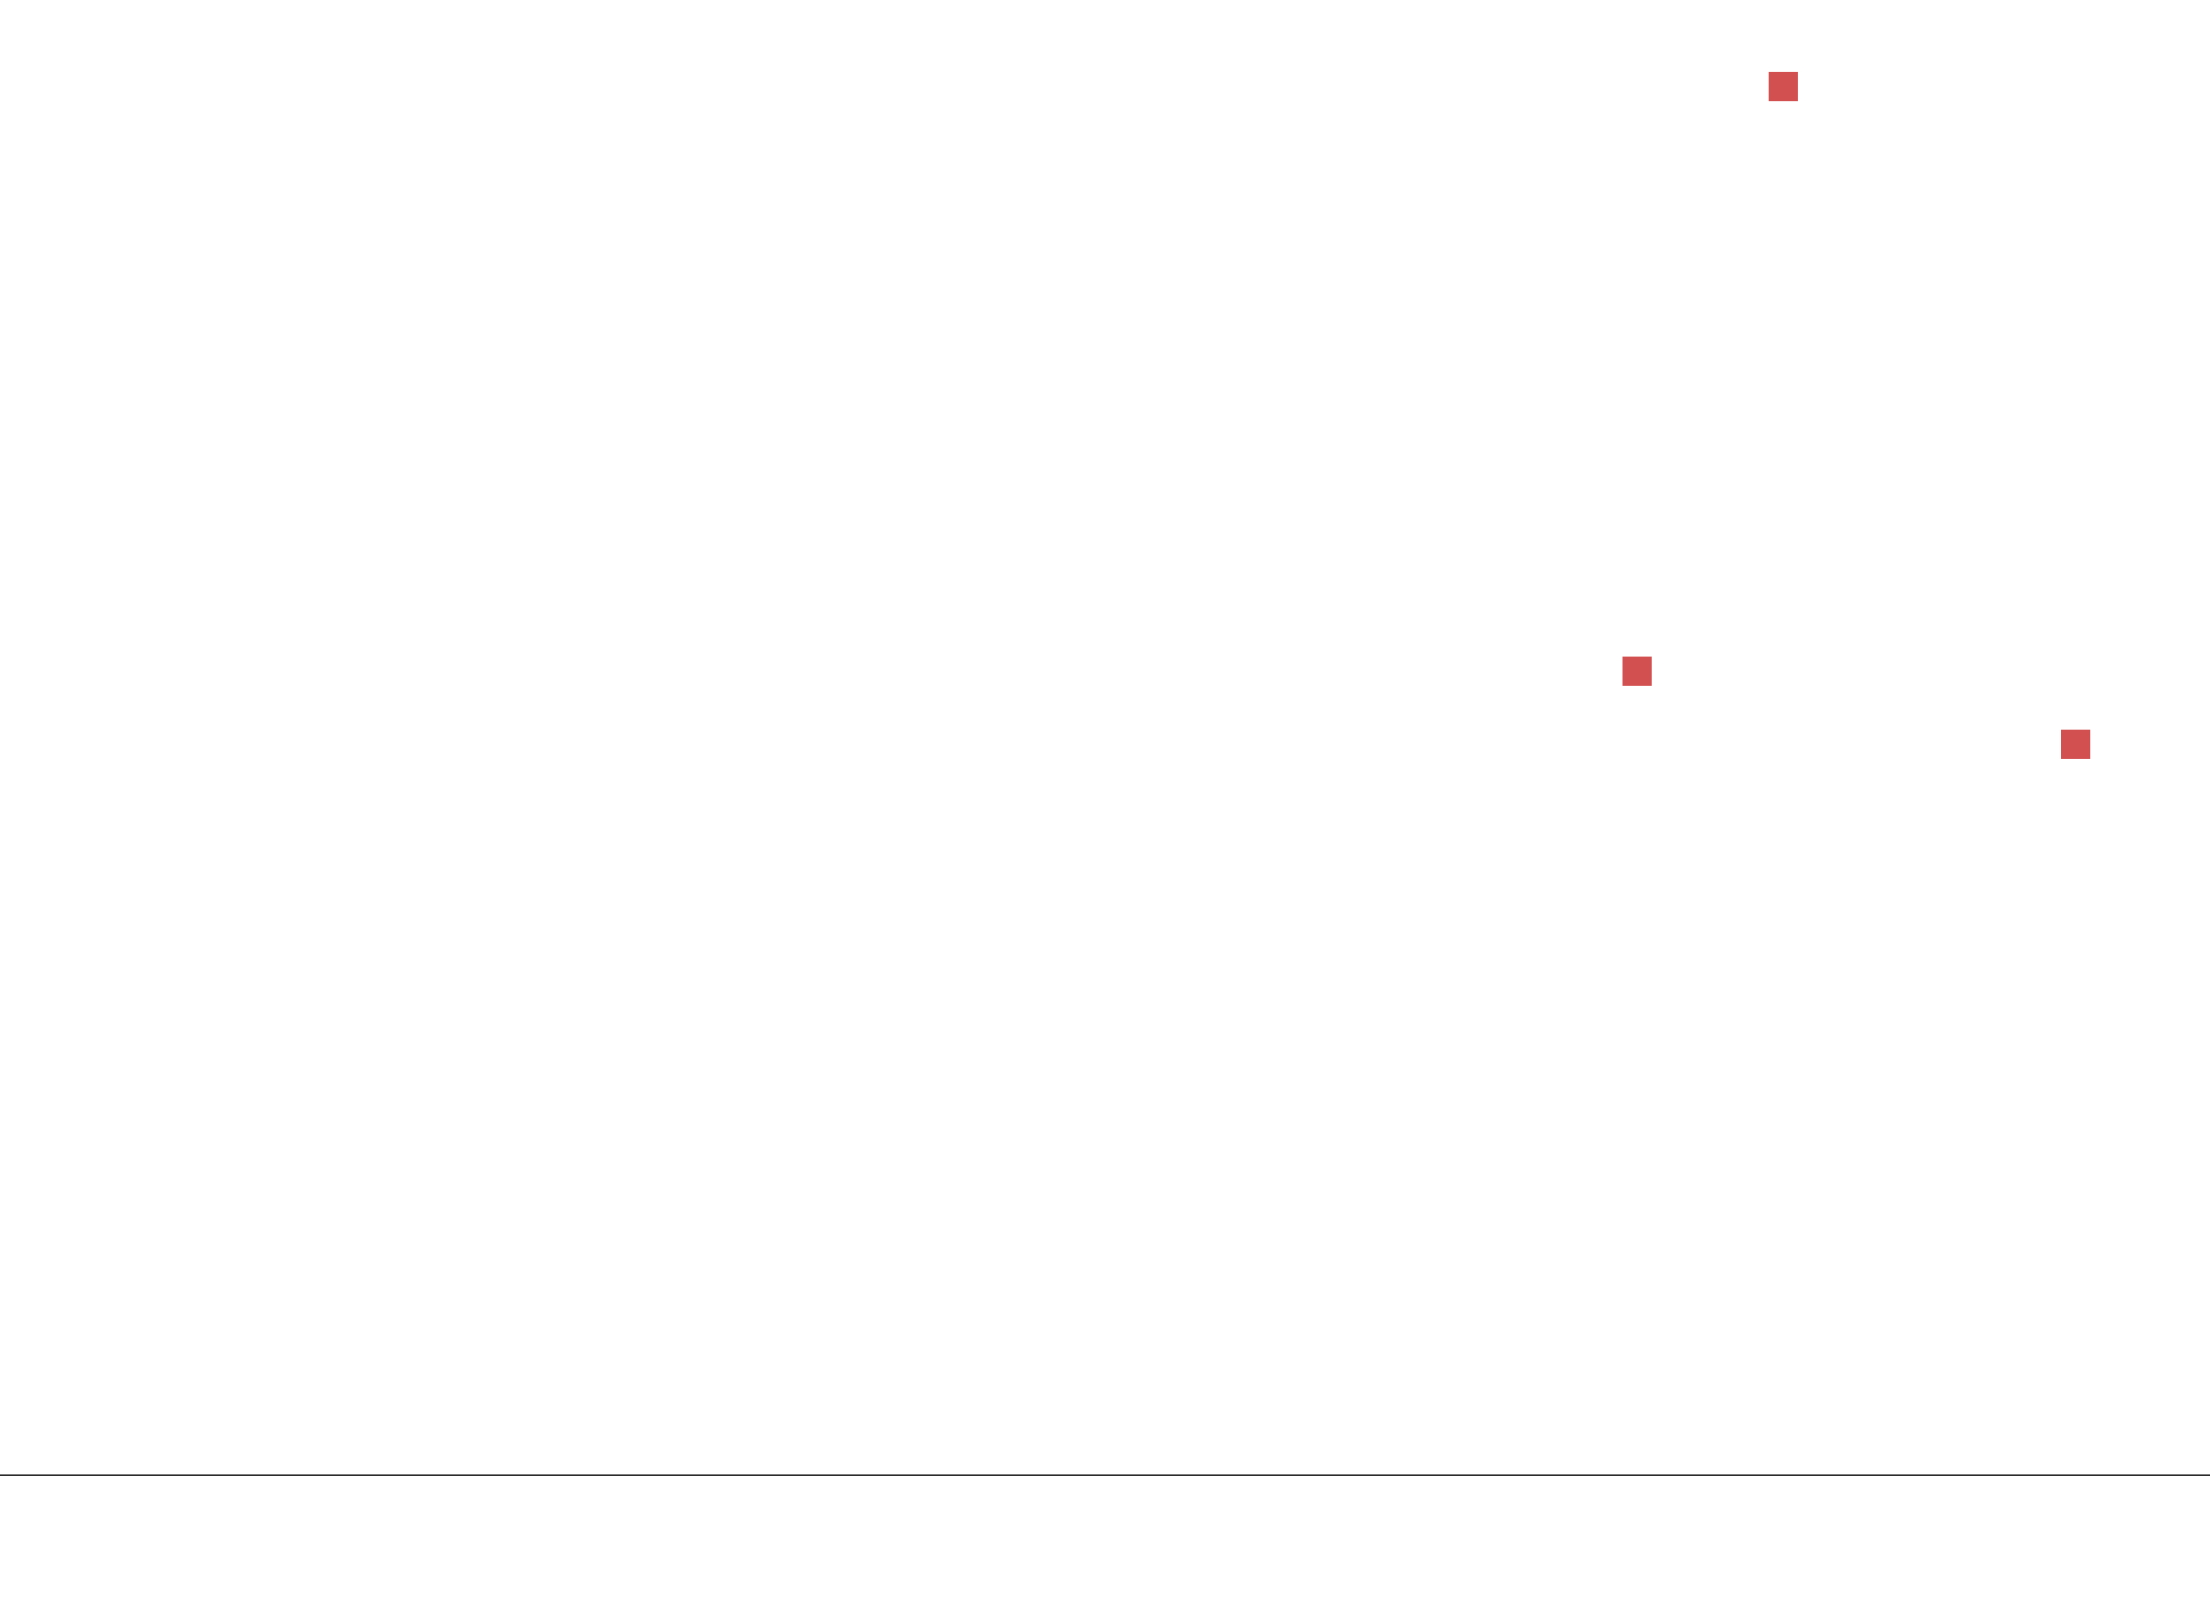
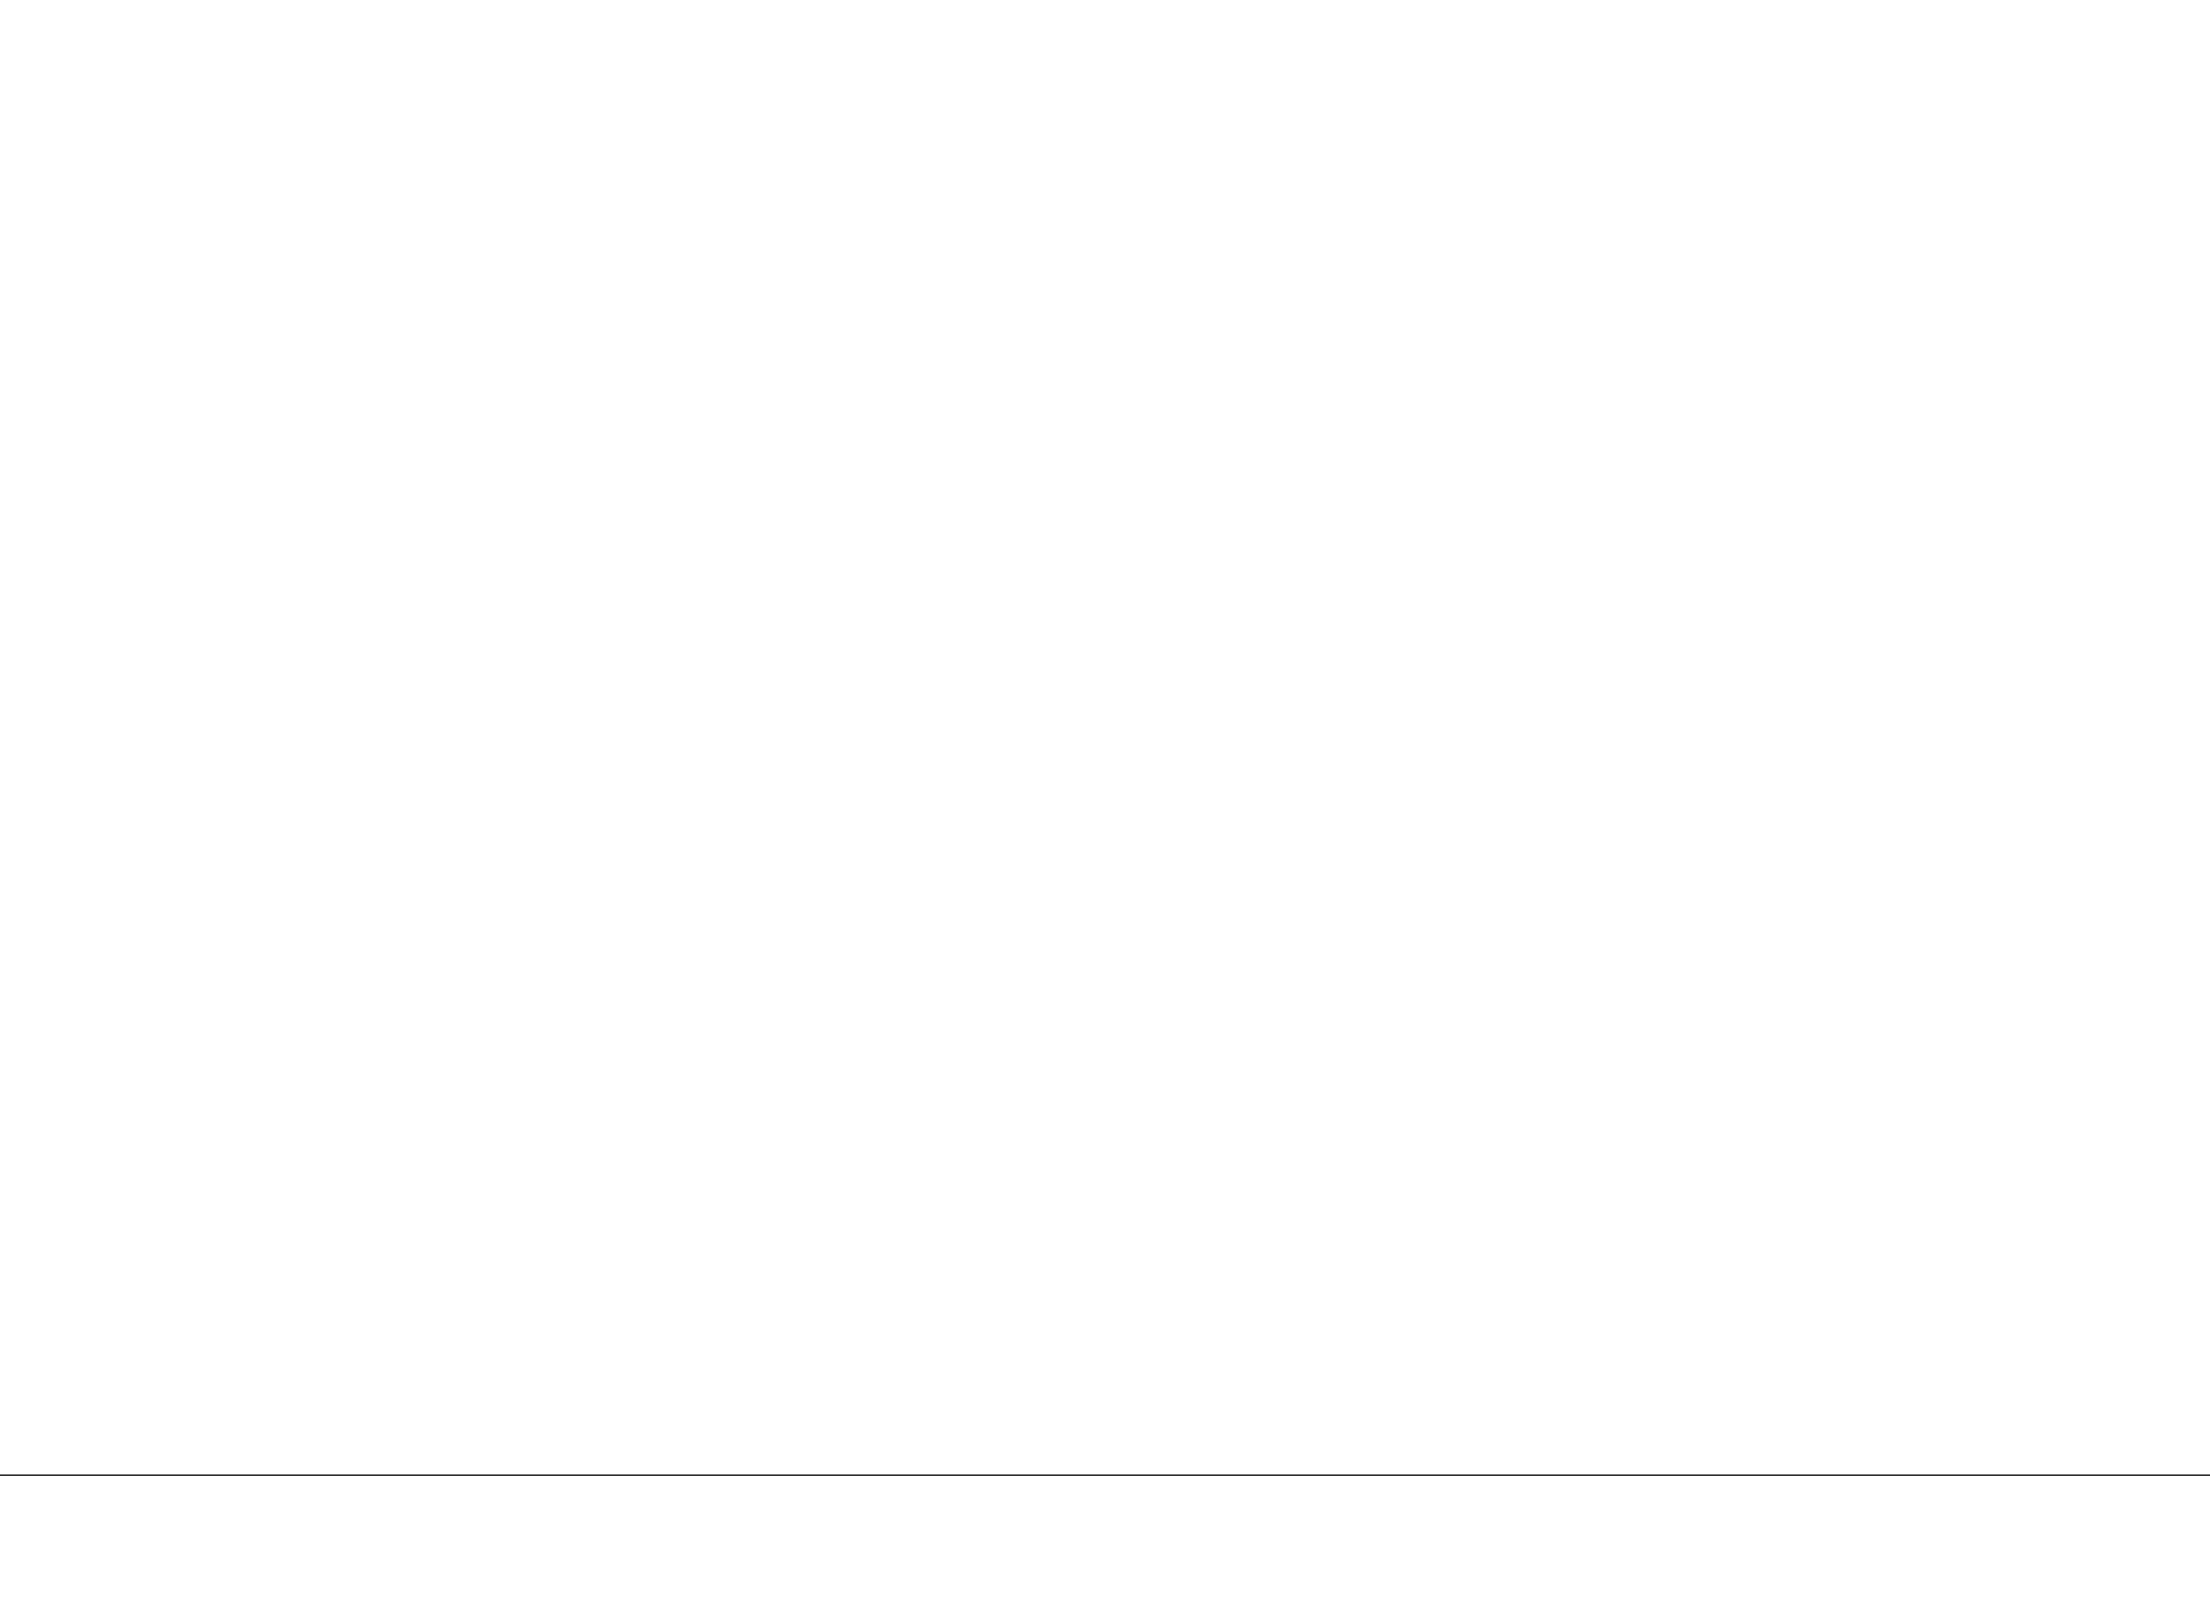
part: (1783, 86) -> none
part: (1637, 671) -> none
part: (2075, 744) -> none

